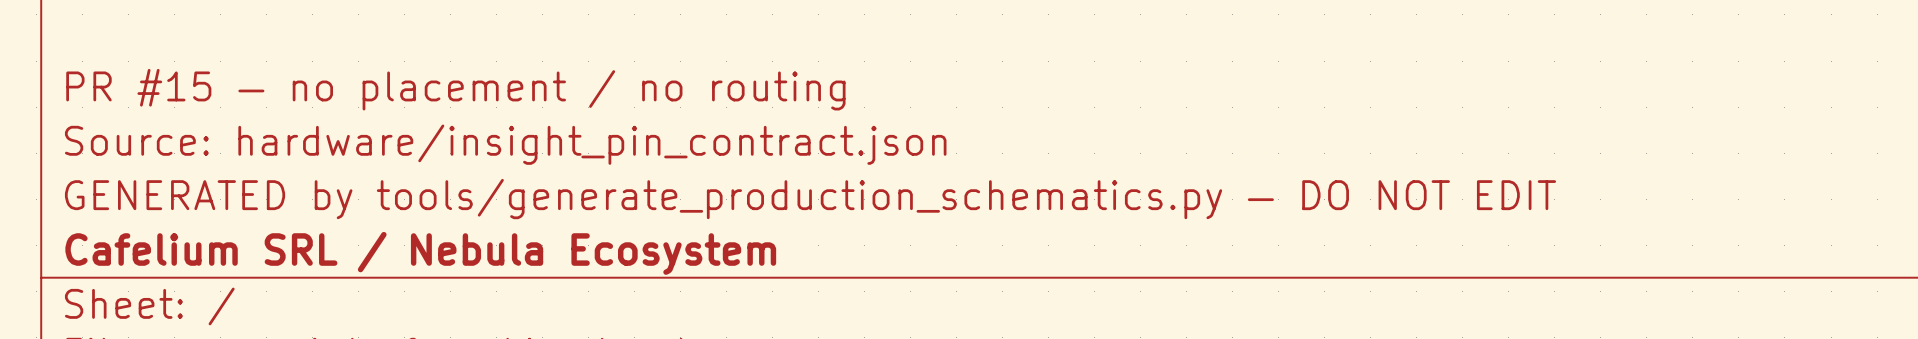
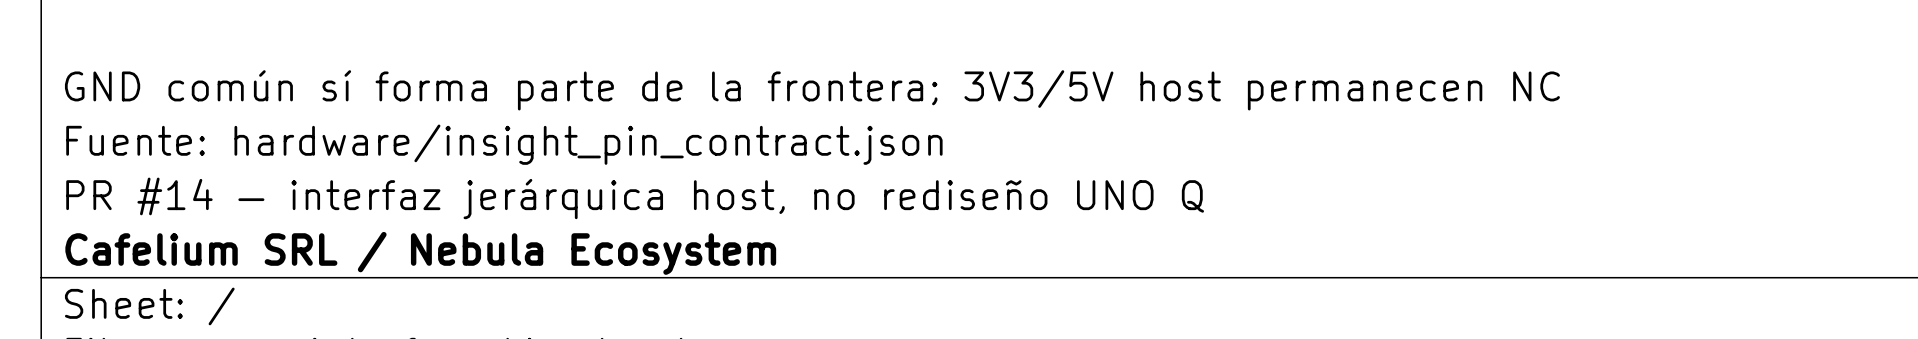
title block: PR #15 — no placement / no routing (455, 89) -> GND común sí forma parte de la frontera; 3V3/5V host permanecen NC (812, 90)
title block: Source: hardware/insight_pin_contract.json (505, 144) -> Fuente: hardware/insight_pin_contract.json (504, 144)
title block: GENERATED by tools/generate_production_schematics.py — DO NOT EDIT (810, 199) -> PR #14 — interfaz jerárquica host, no rediseño UNO Q (635, 198)

